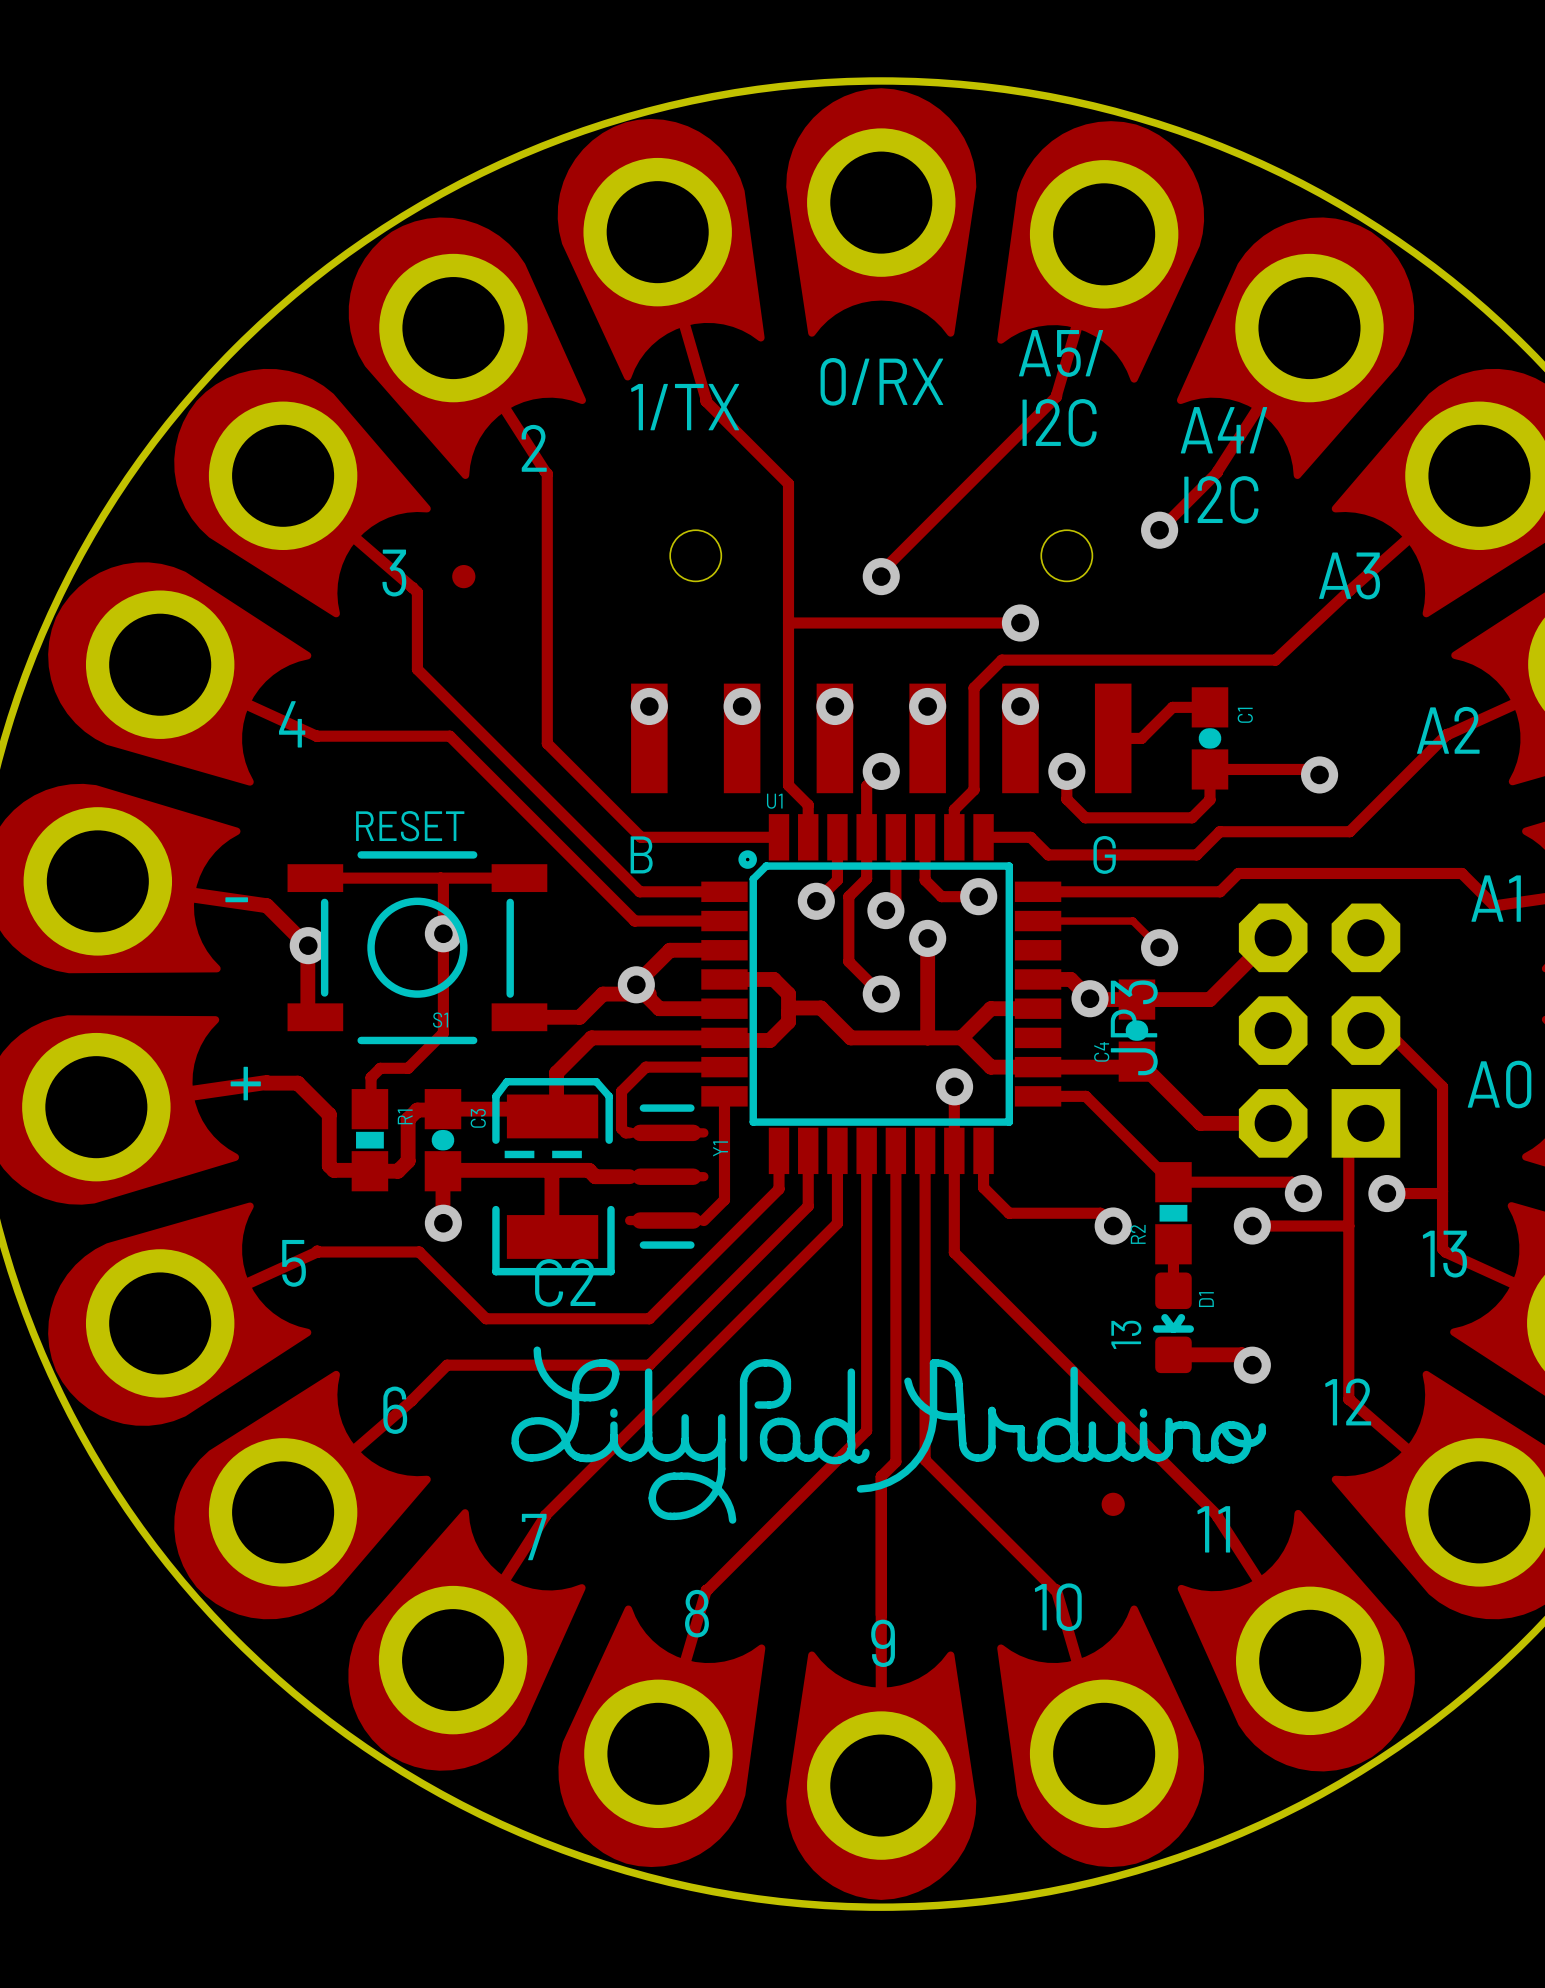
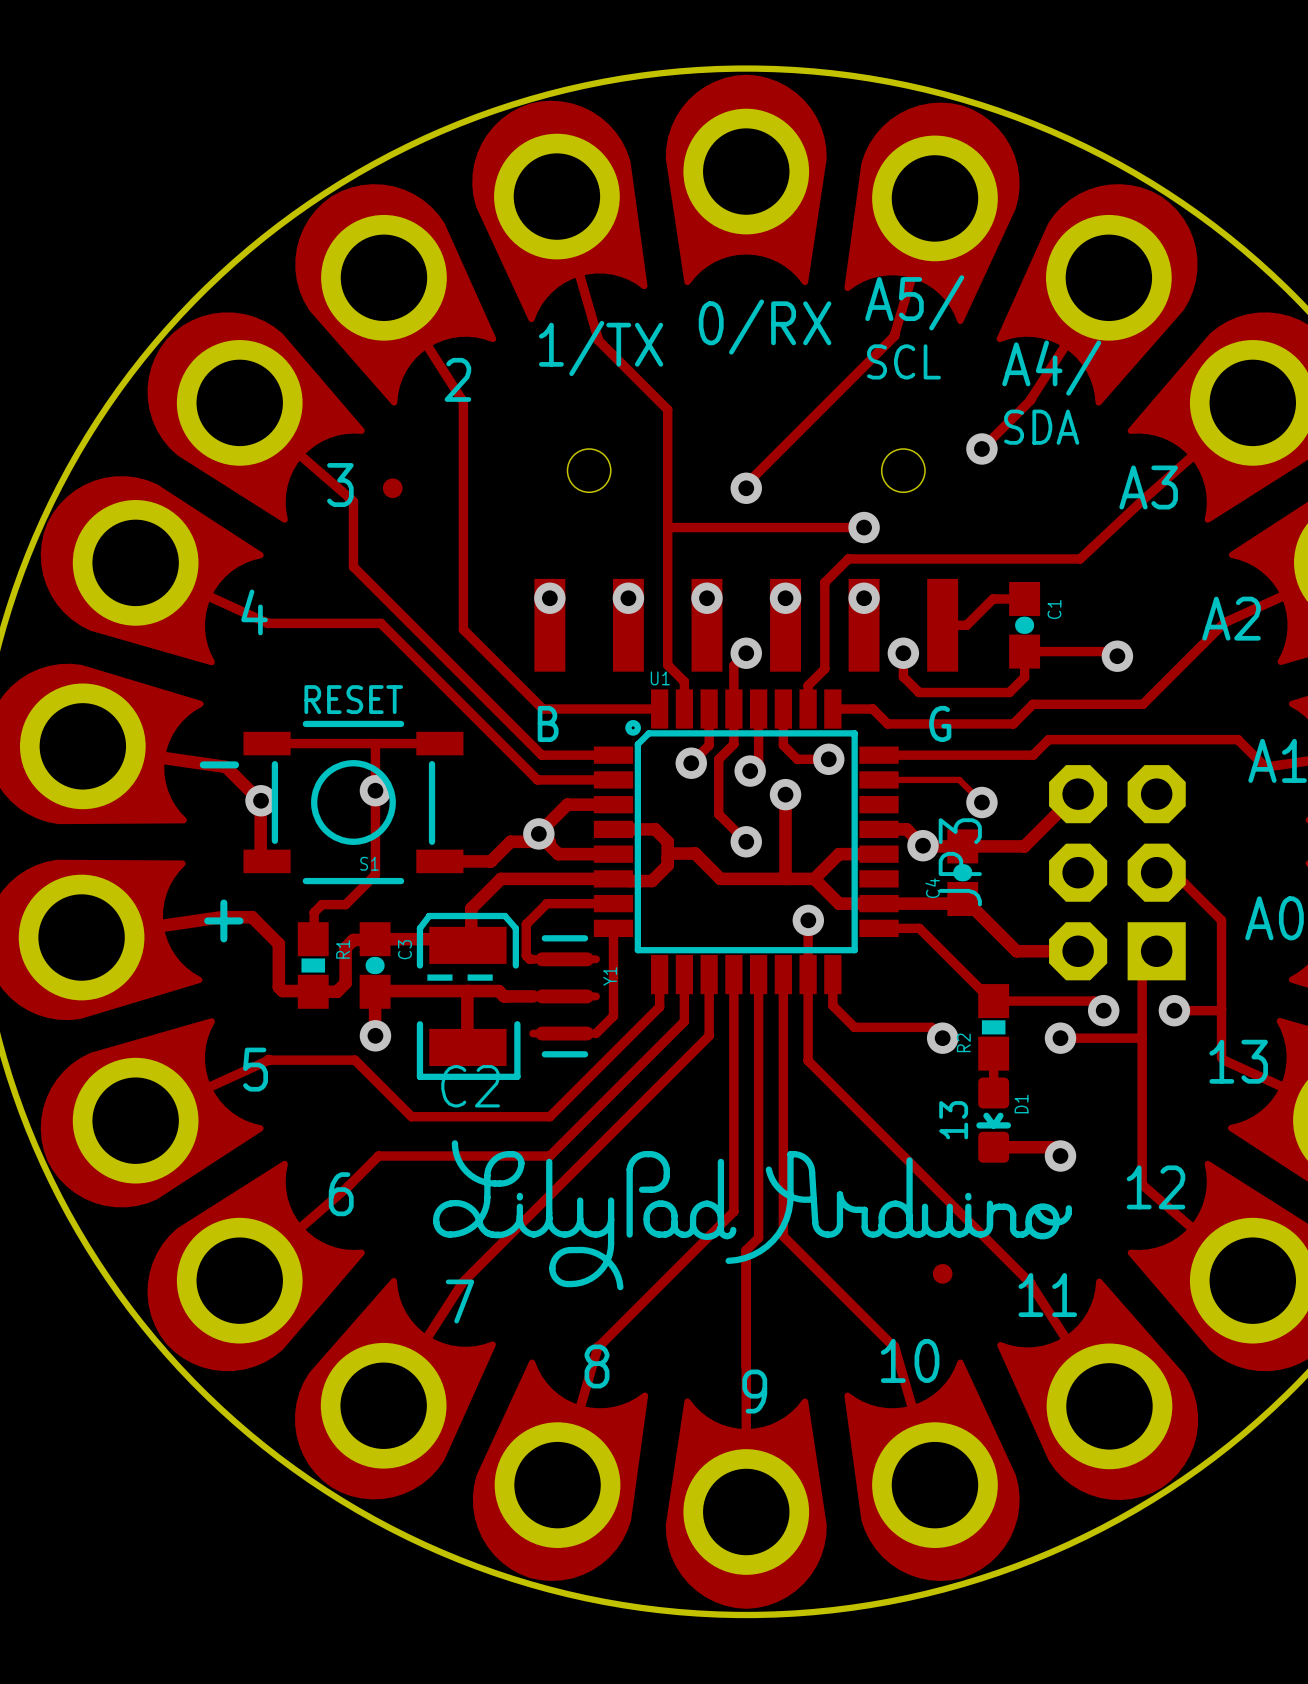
text: I2C (1059, 422) -> SCL (903, 361)
text: I2C (1221, 499) -> SDA (1041, 427)

